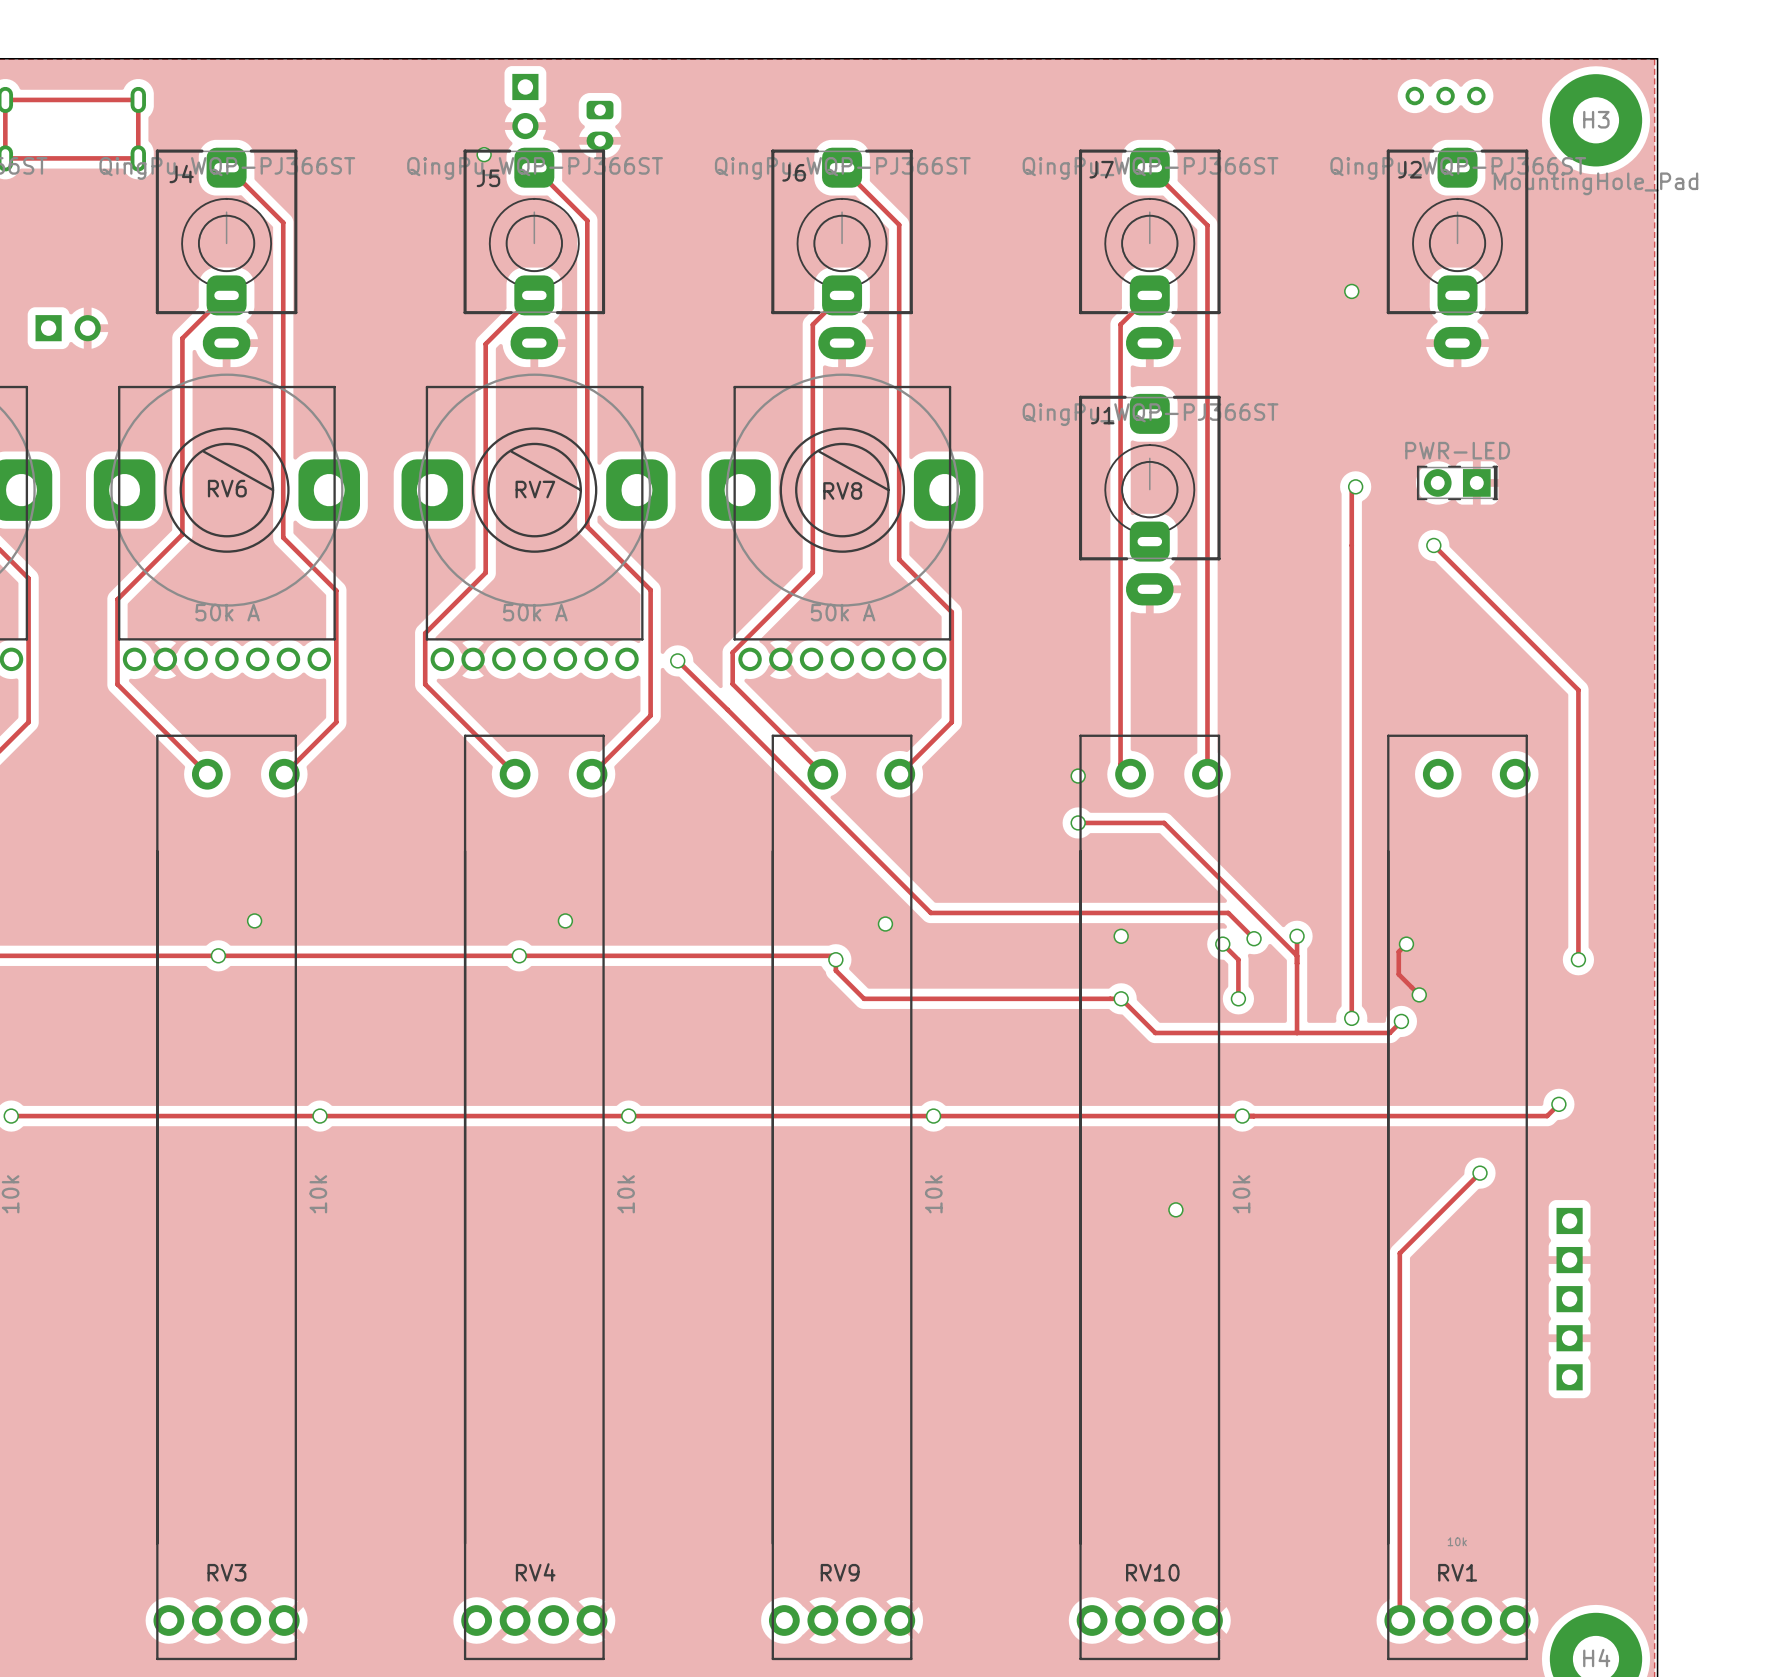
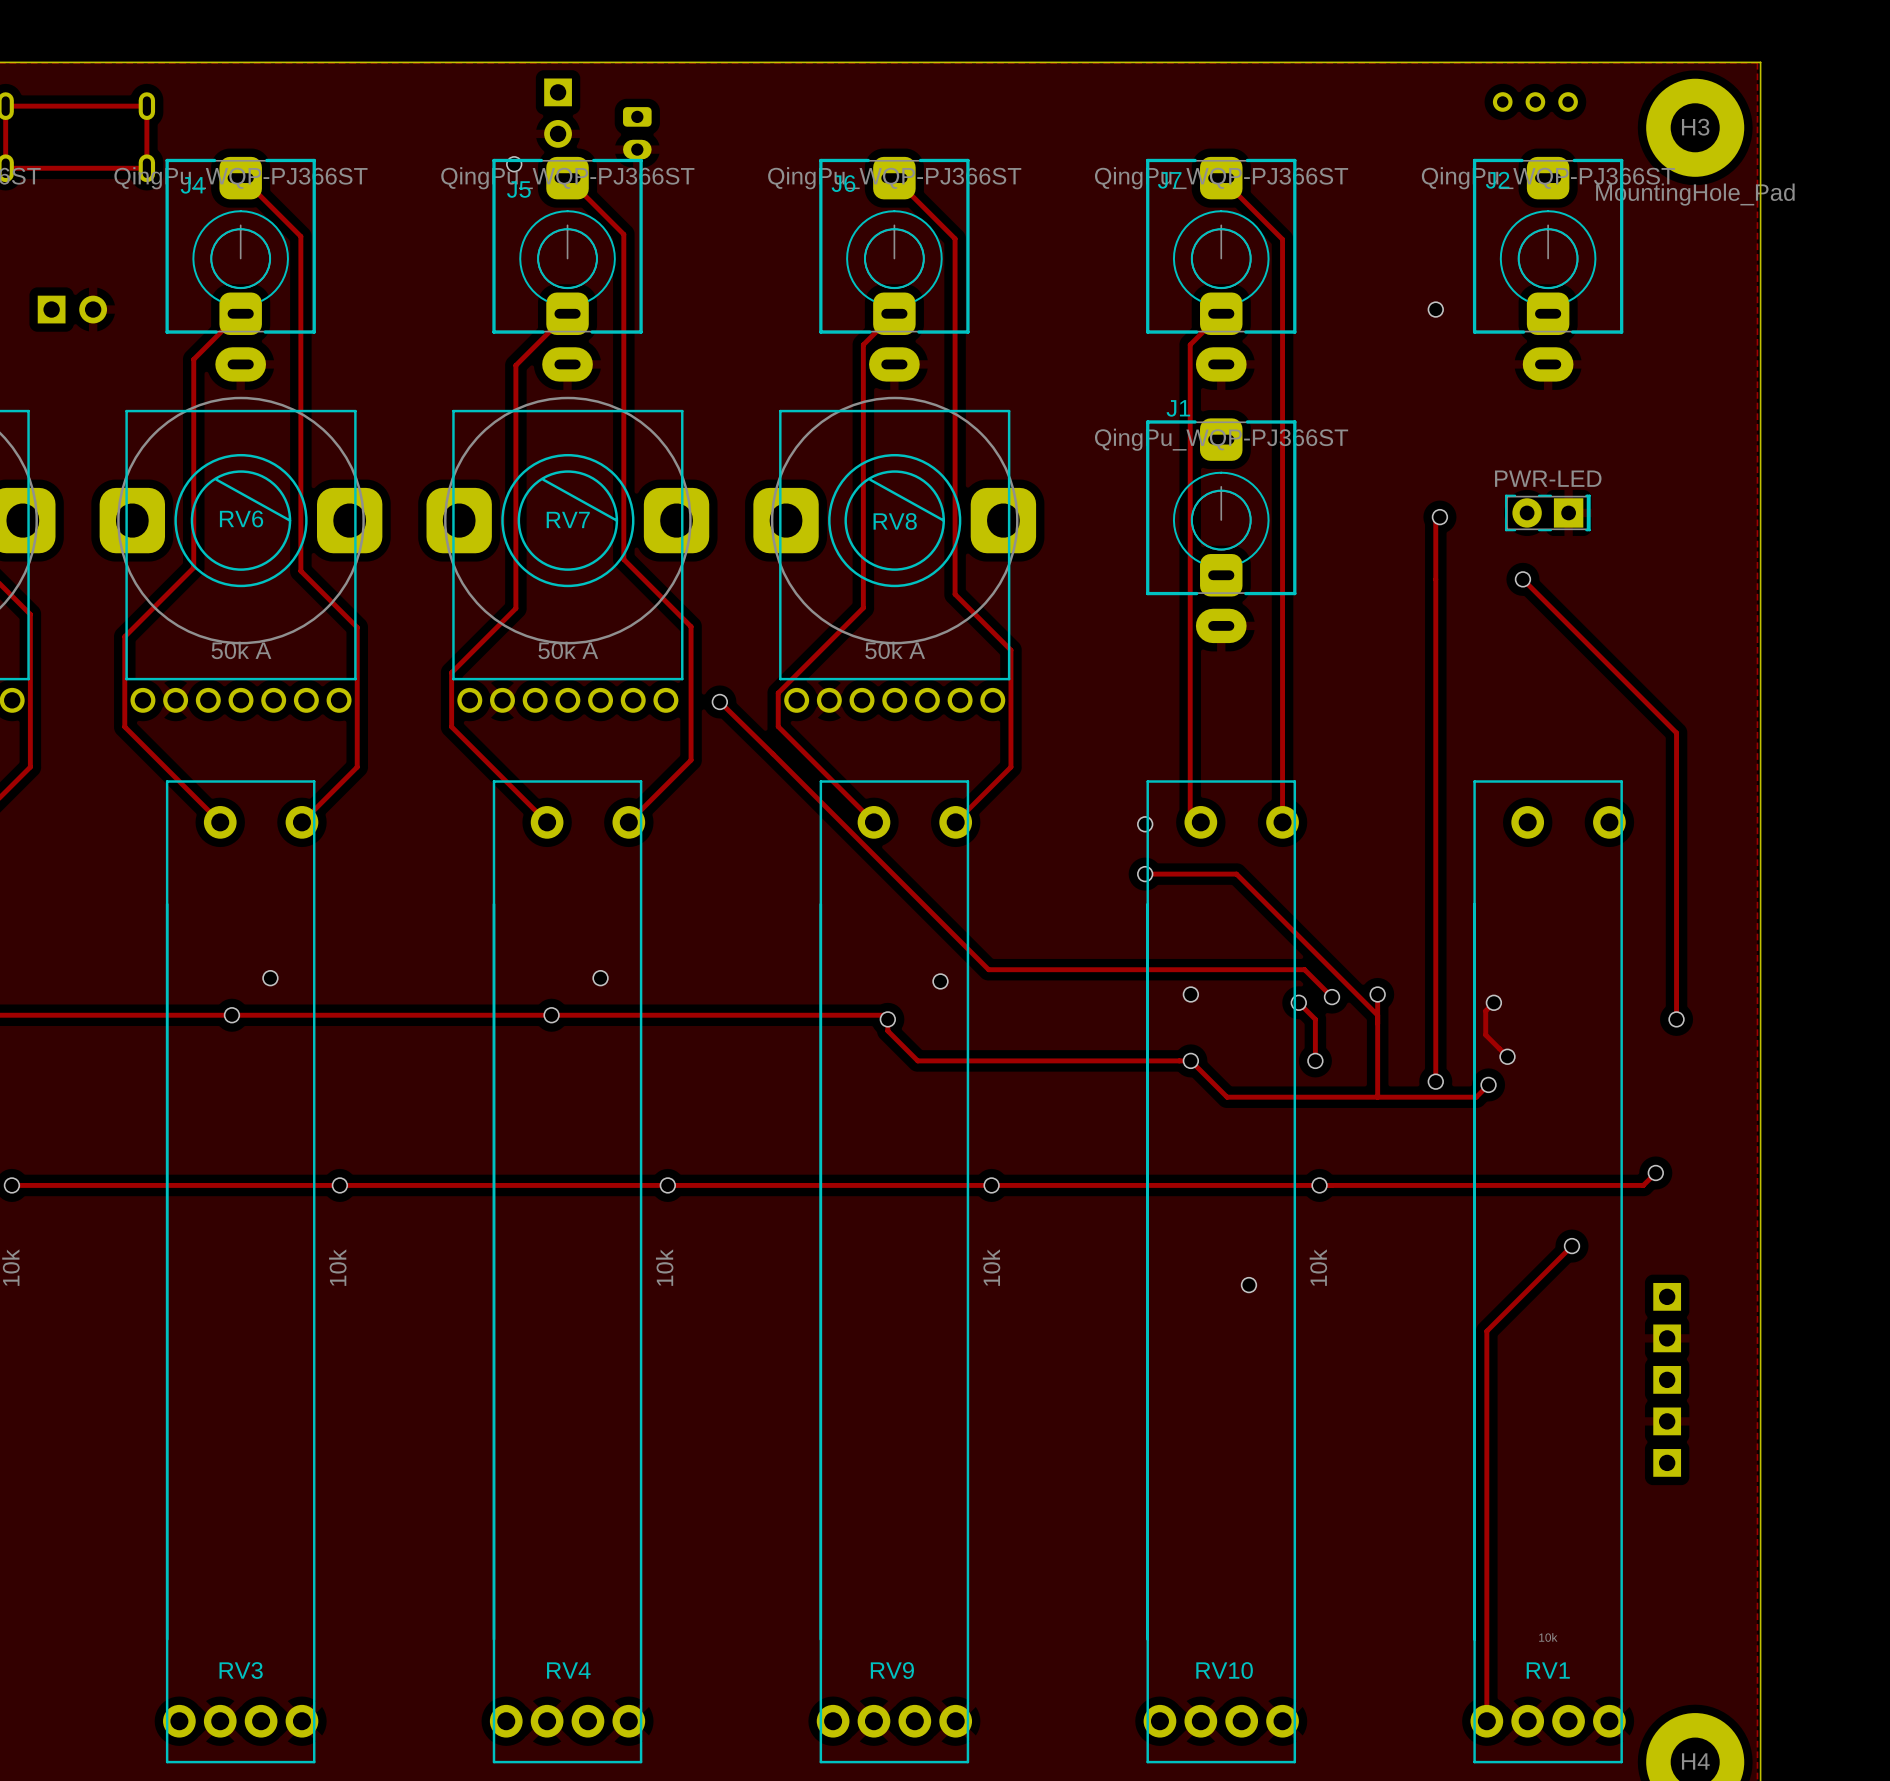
part position: (68, 328) -> (72, 309)
J1 name position: J1 (1102, 415) -> J1 (1178, 408)

